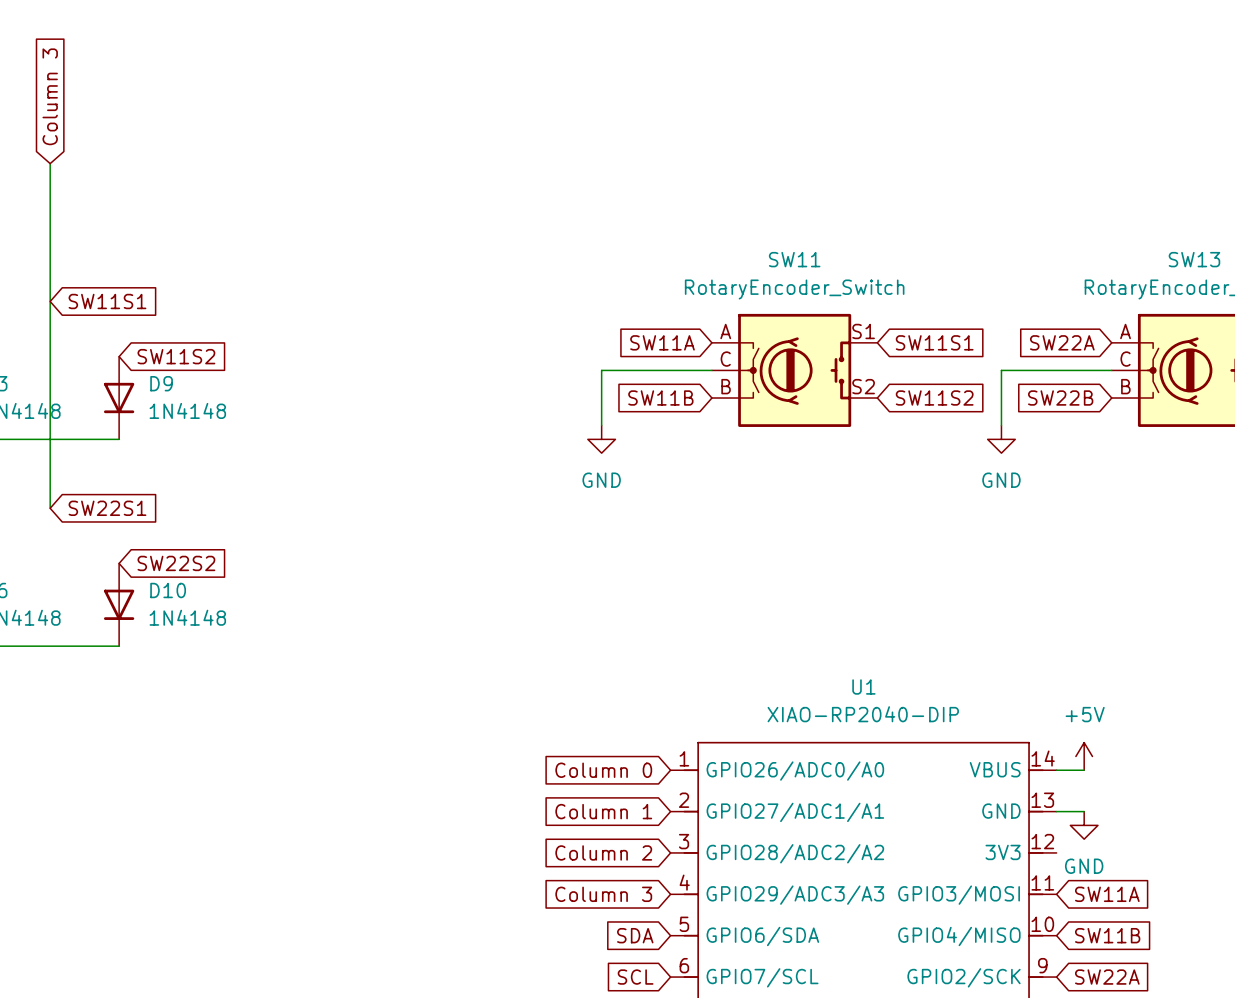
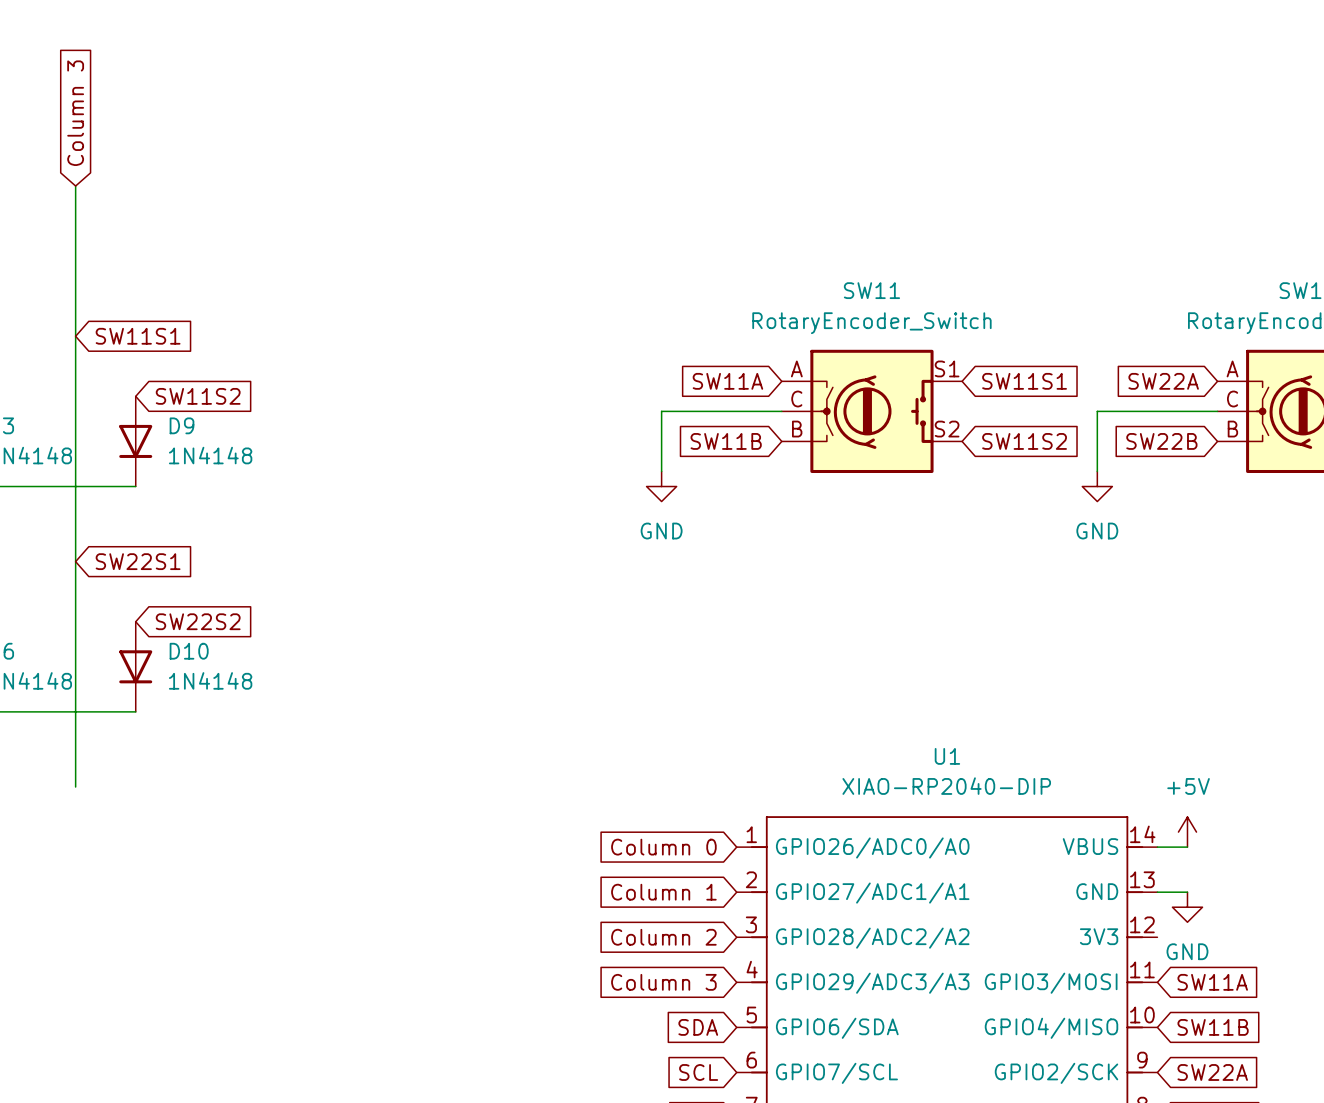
global label position: Column 3 (50, 96) -> Column 3 (75, 113)
wire: (50, 163) (50, 508) -> none
wire: none -> (75, 186) (75, 787)
global label position: SW11S1 (107, 301) -> SW11S1 (138, 336)
global label position: SW22S1 (107, 508) -> SW22S1 (138, 561)

